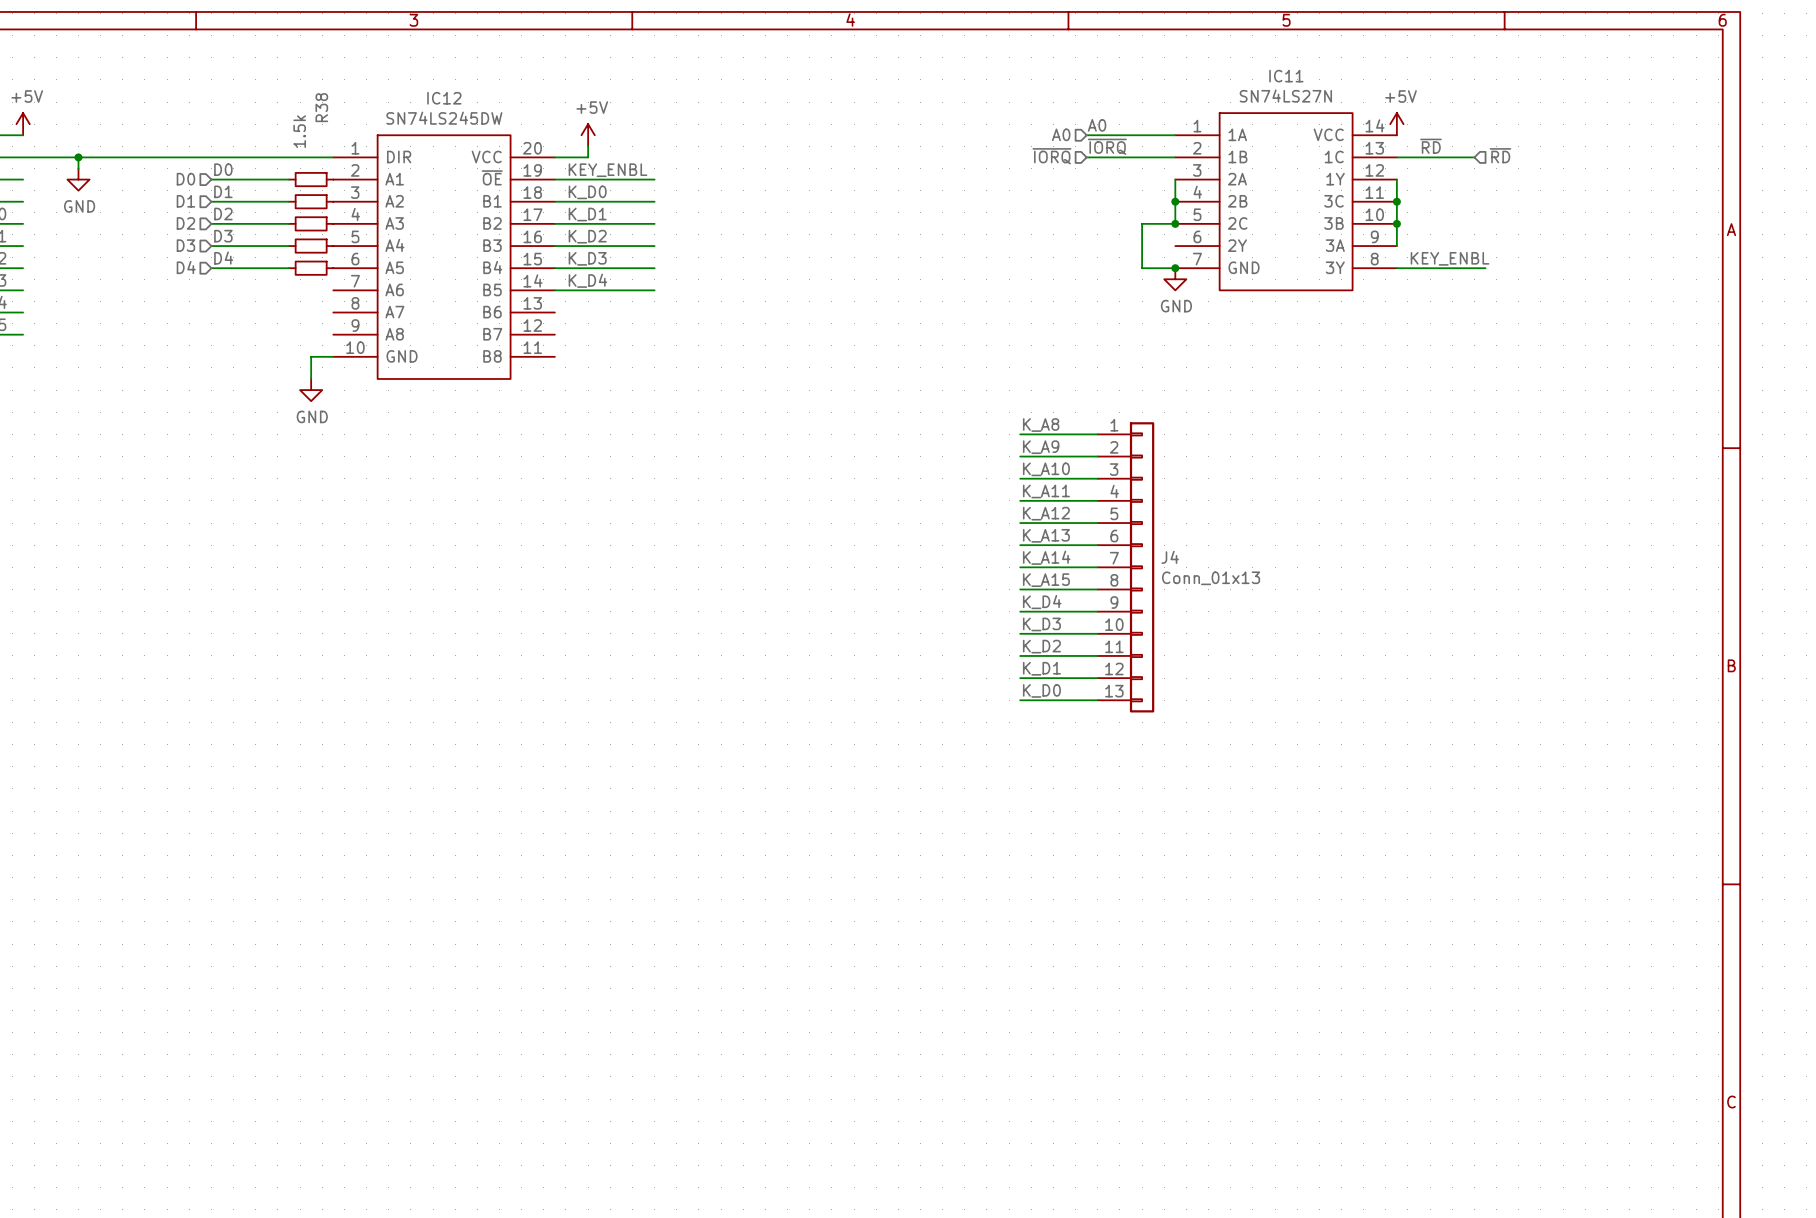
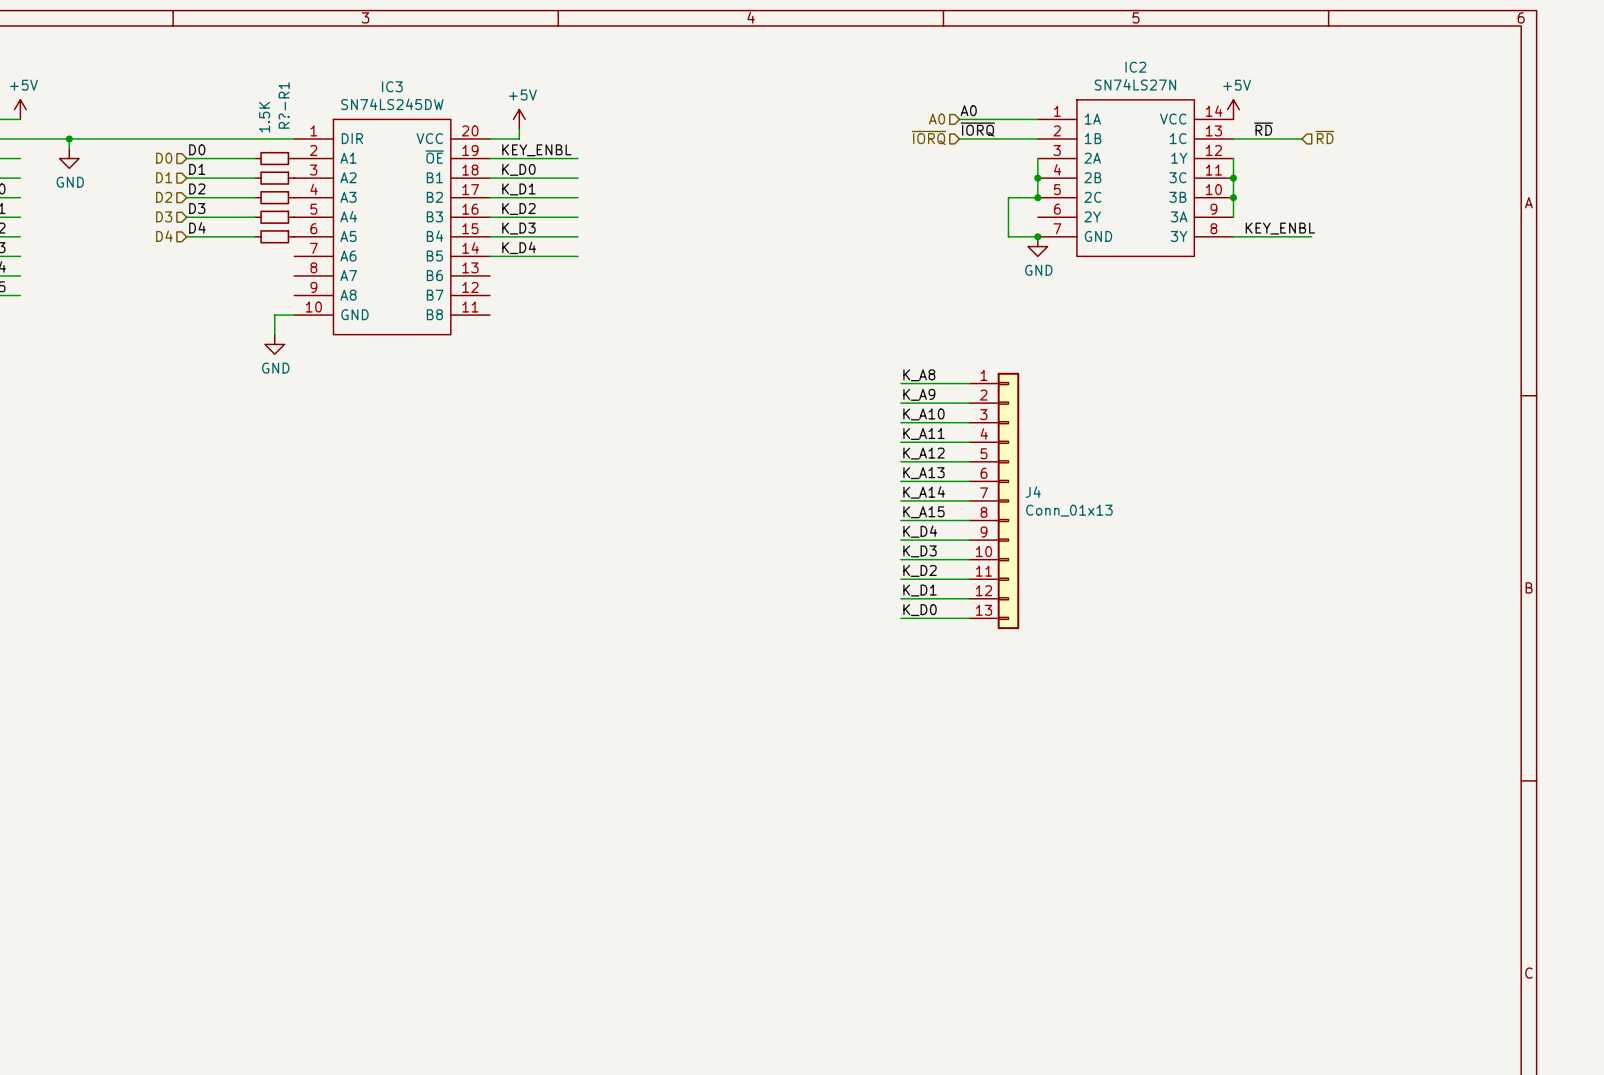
IC11 name: IC11 (1286, 76) -> IC2 (1135, 67)
IC12 name: IC12 (444, 98) -> IC3 (392, 86)
R38 name: R38 (321, 107) -> R?-R1 (284, 105)
R38 value: 1.5k (299, 131) -> 1.5K (264, 117)

